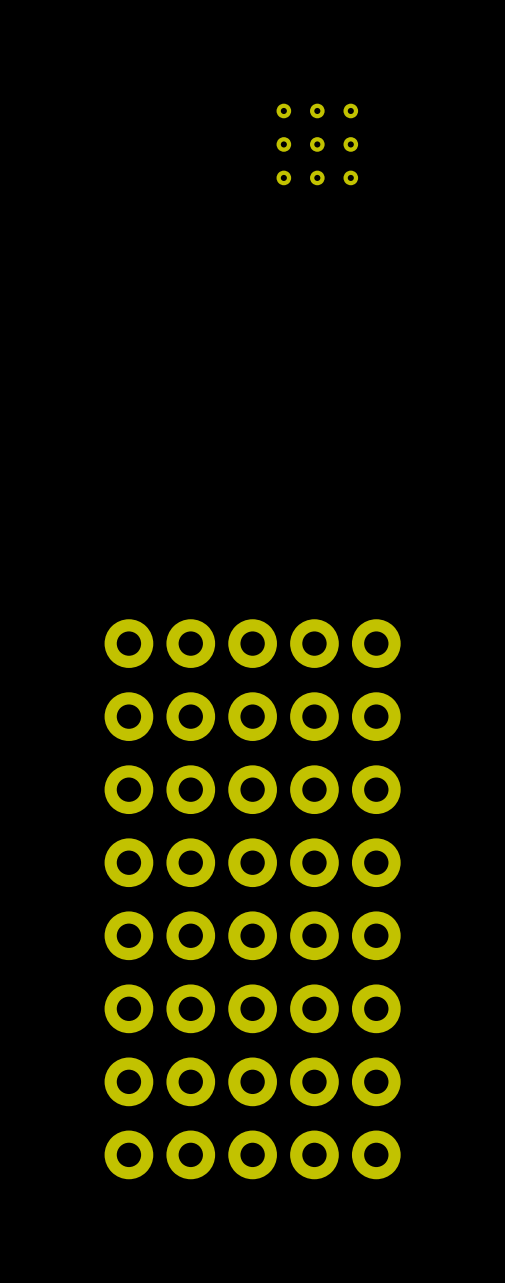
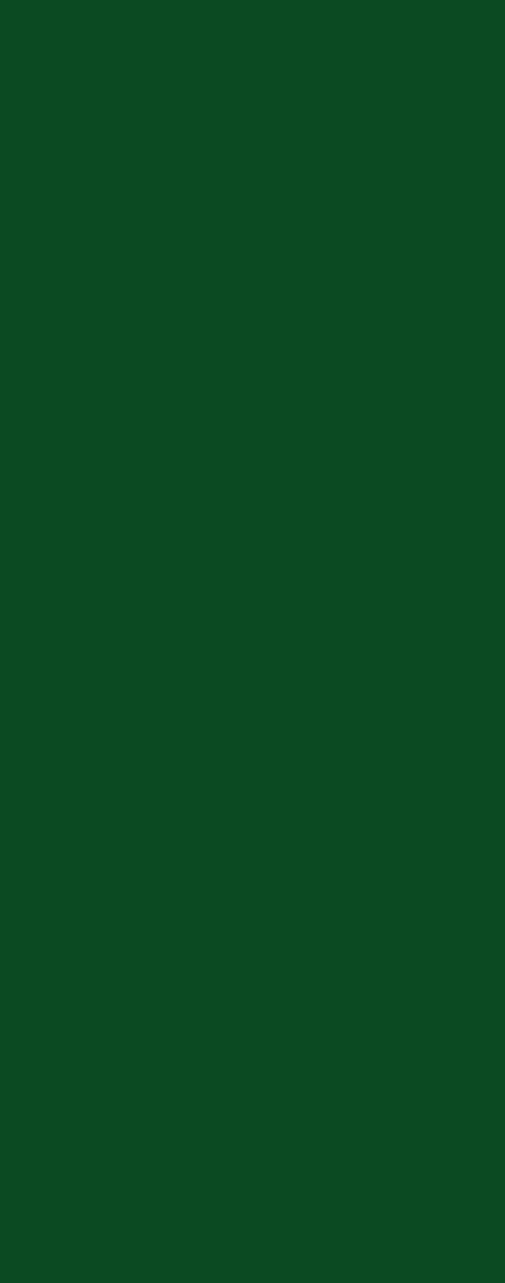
part: (317, 144) -> none
part: (252, 643) -> none
part: (252, 716) -> none
part: (252, 789) -> none
part: (252, 862) -> none
part: (252, 935) -> none
part: (252, 1008) -> none
part: (252, 1081) -> none
part: (252, 1154) -> none

